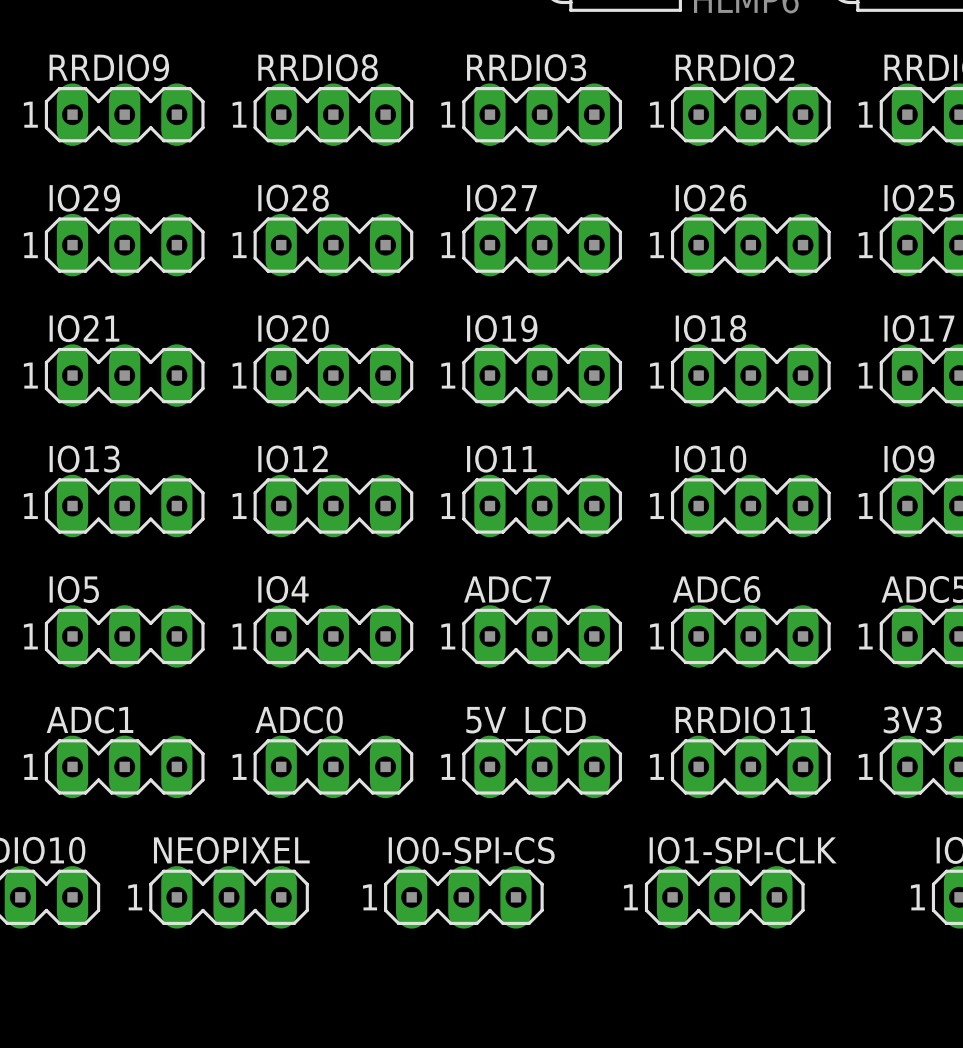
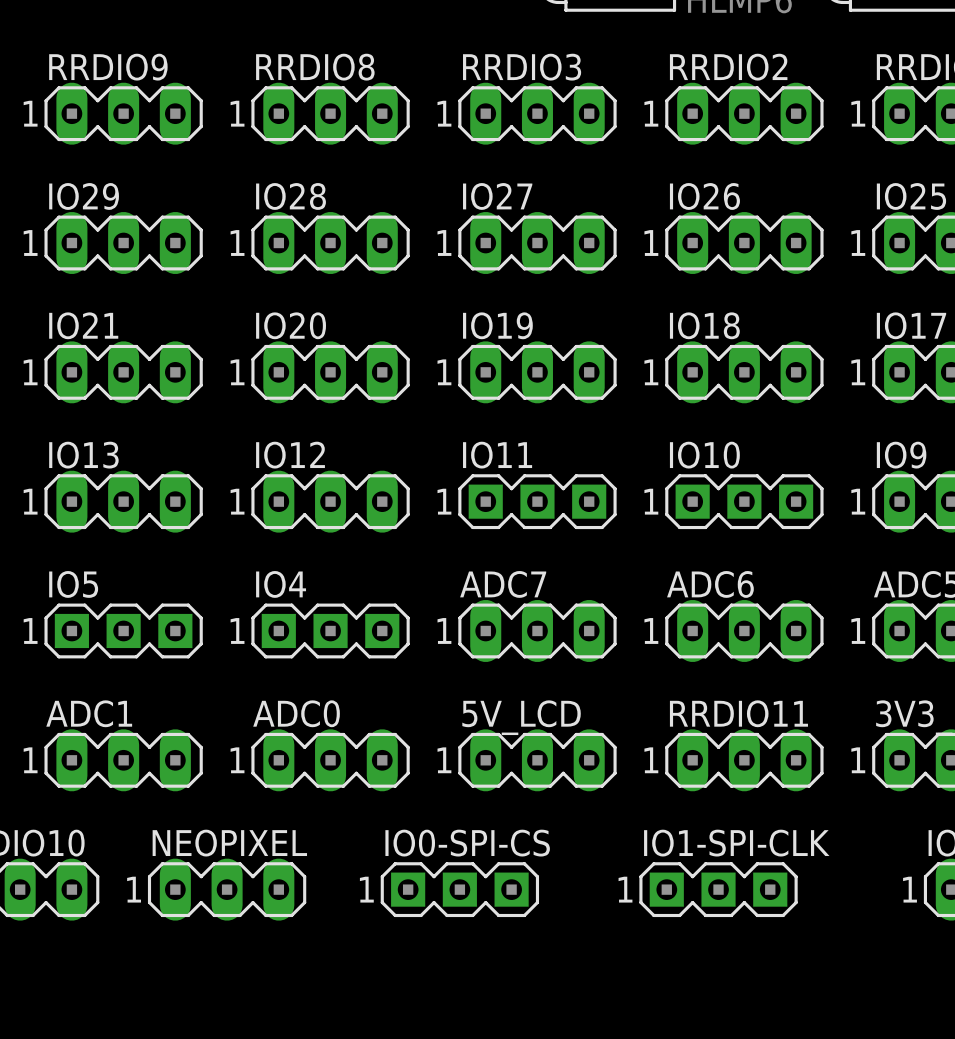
IO11 footprint: [462, 474, 622, 538] -> [458, 474, 617, 530]
IO10 footprint: [671, 474, 831, 538] -> [665, 474, 824, 530]
IO5 footprint: [44, 605, 205, 668] -> [44, 603, 203, 659]
IO4 footprint: [253, 605, 414, 668] -> [251, 603, 410, 659]
IO0-SPI-CS footprint: [384, 866, 544, 929] -> [380, 862, 540, 918]
IO1-SPI-CLK footprint: [644, 866, 805, 929] -> [639, 862, 798, 918]

